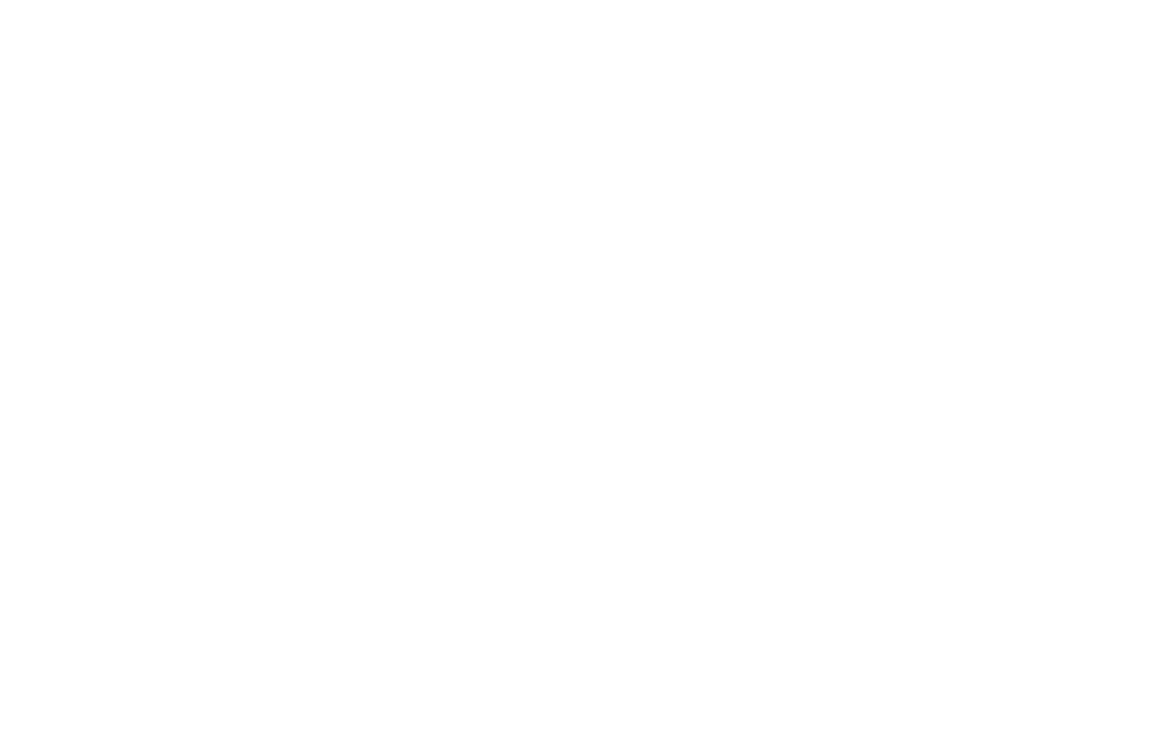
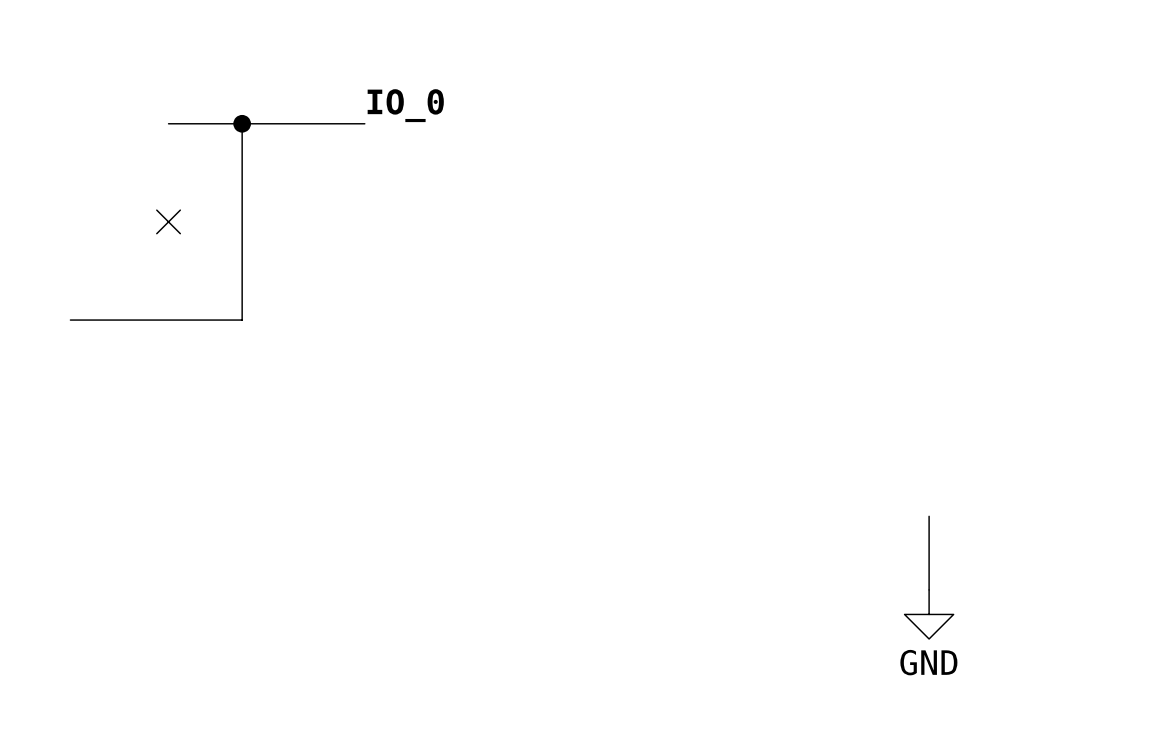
label: none -> IO_0 (405, 105)
wire: none -> (168, 123) (364, 123)
wire: none -> (242, 123) (242, 320) (70, 320)
junction: none -> (242, 123)
no-connect mark: none -> (168, 221)
wire: none -> (929, 516) (929, 589)
power symbol: none -> GND (929, 614)

